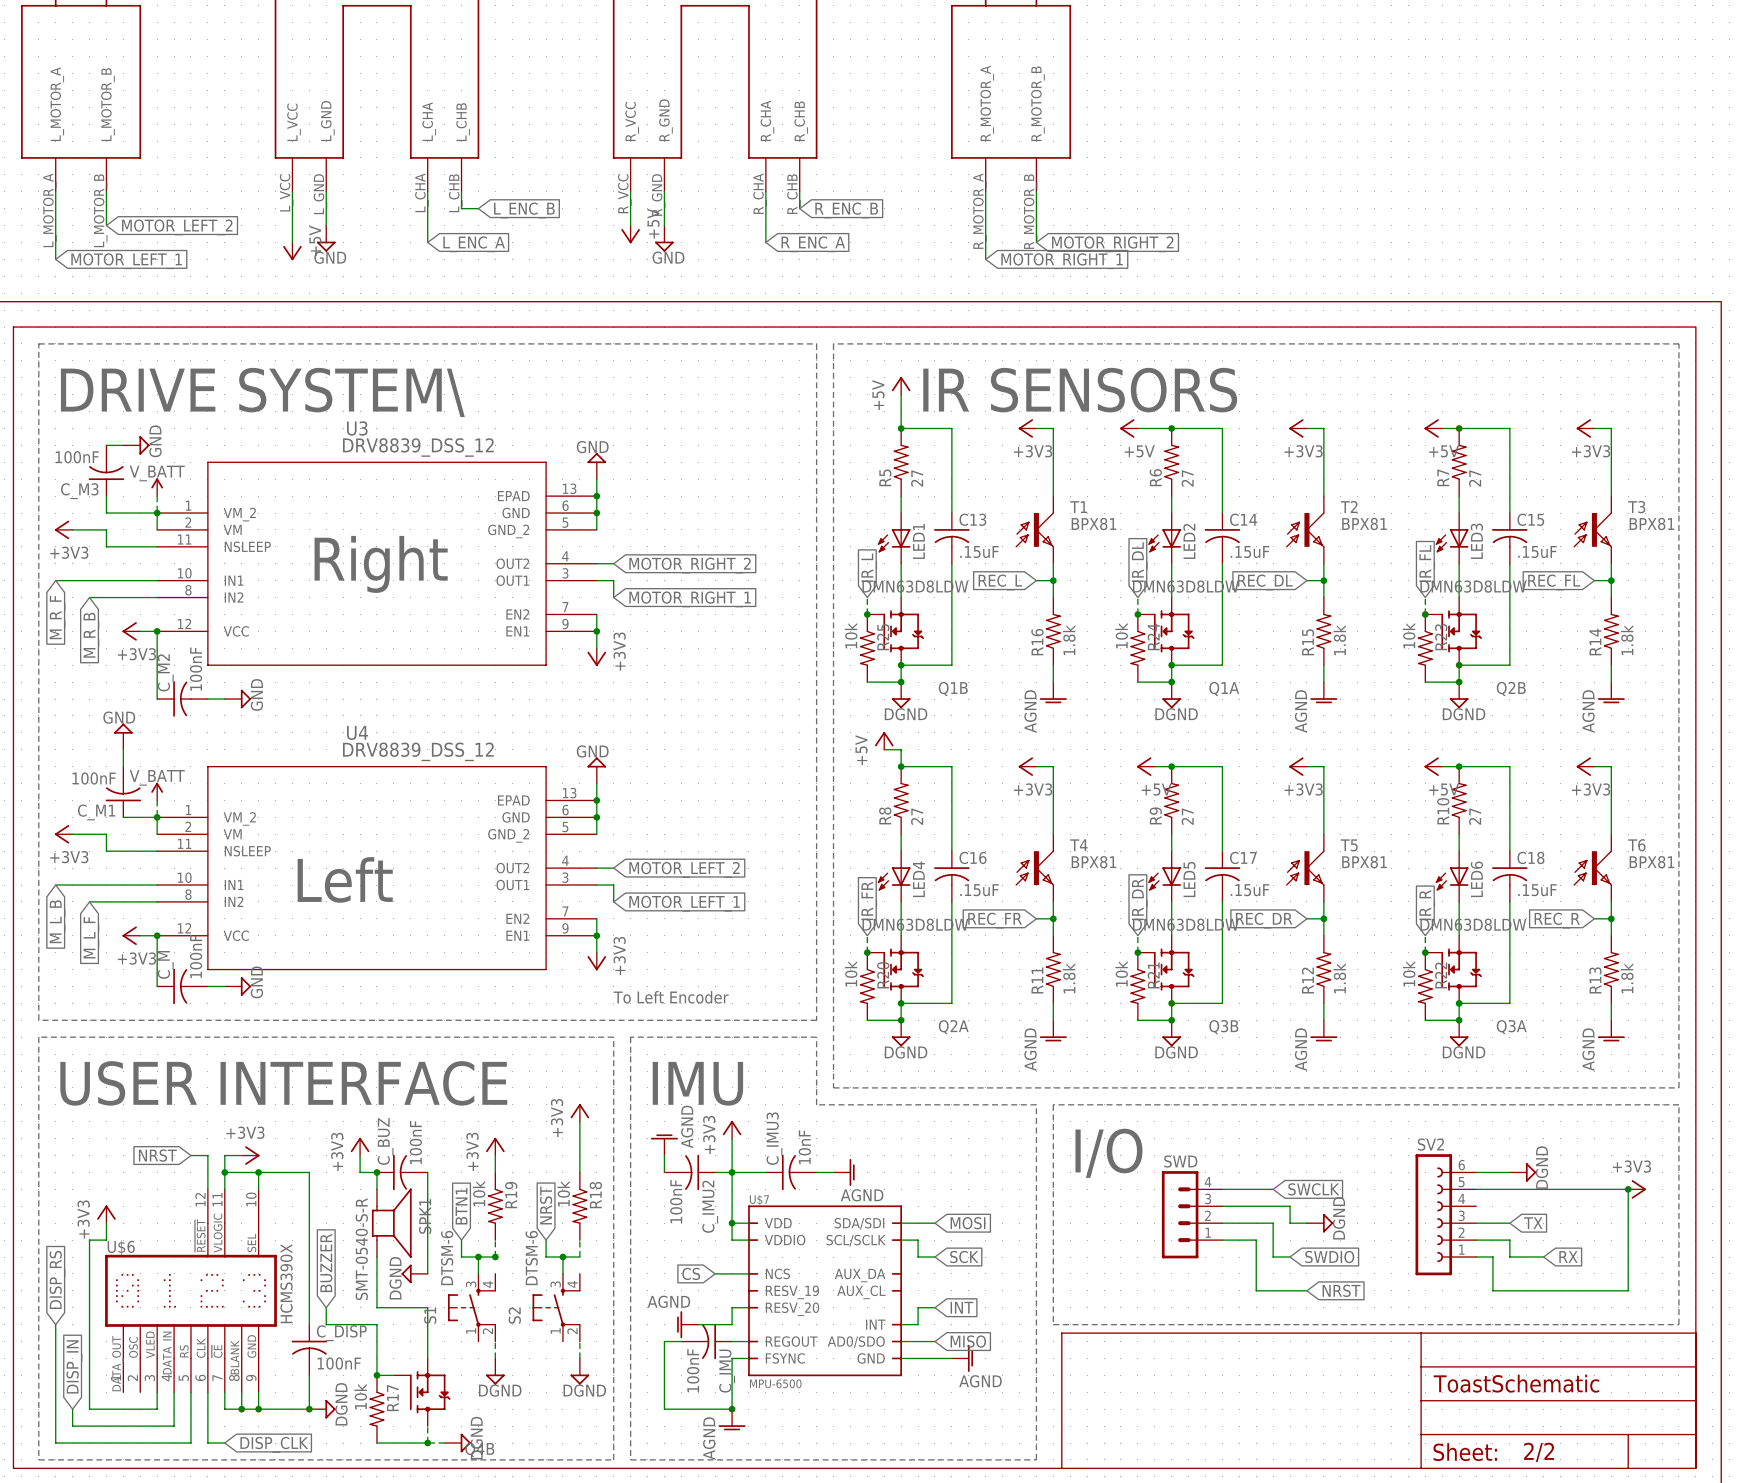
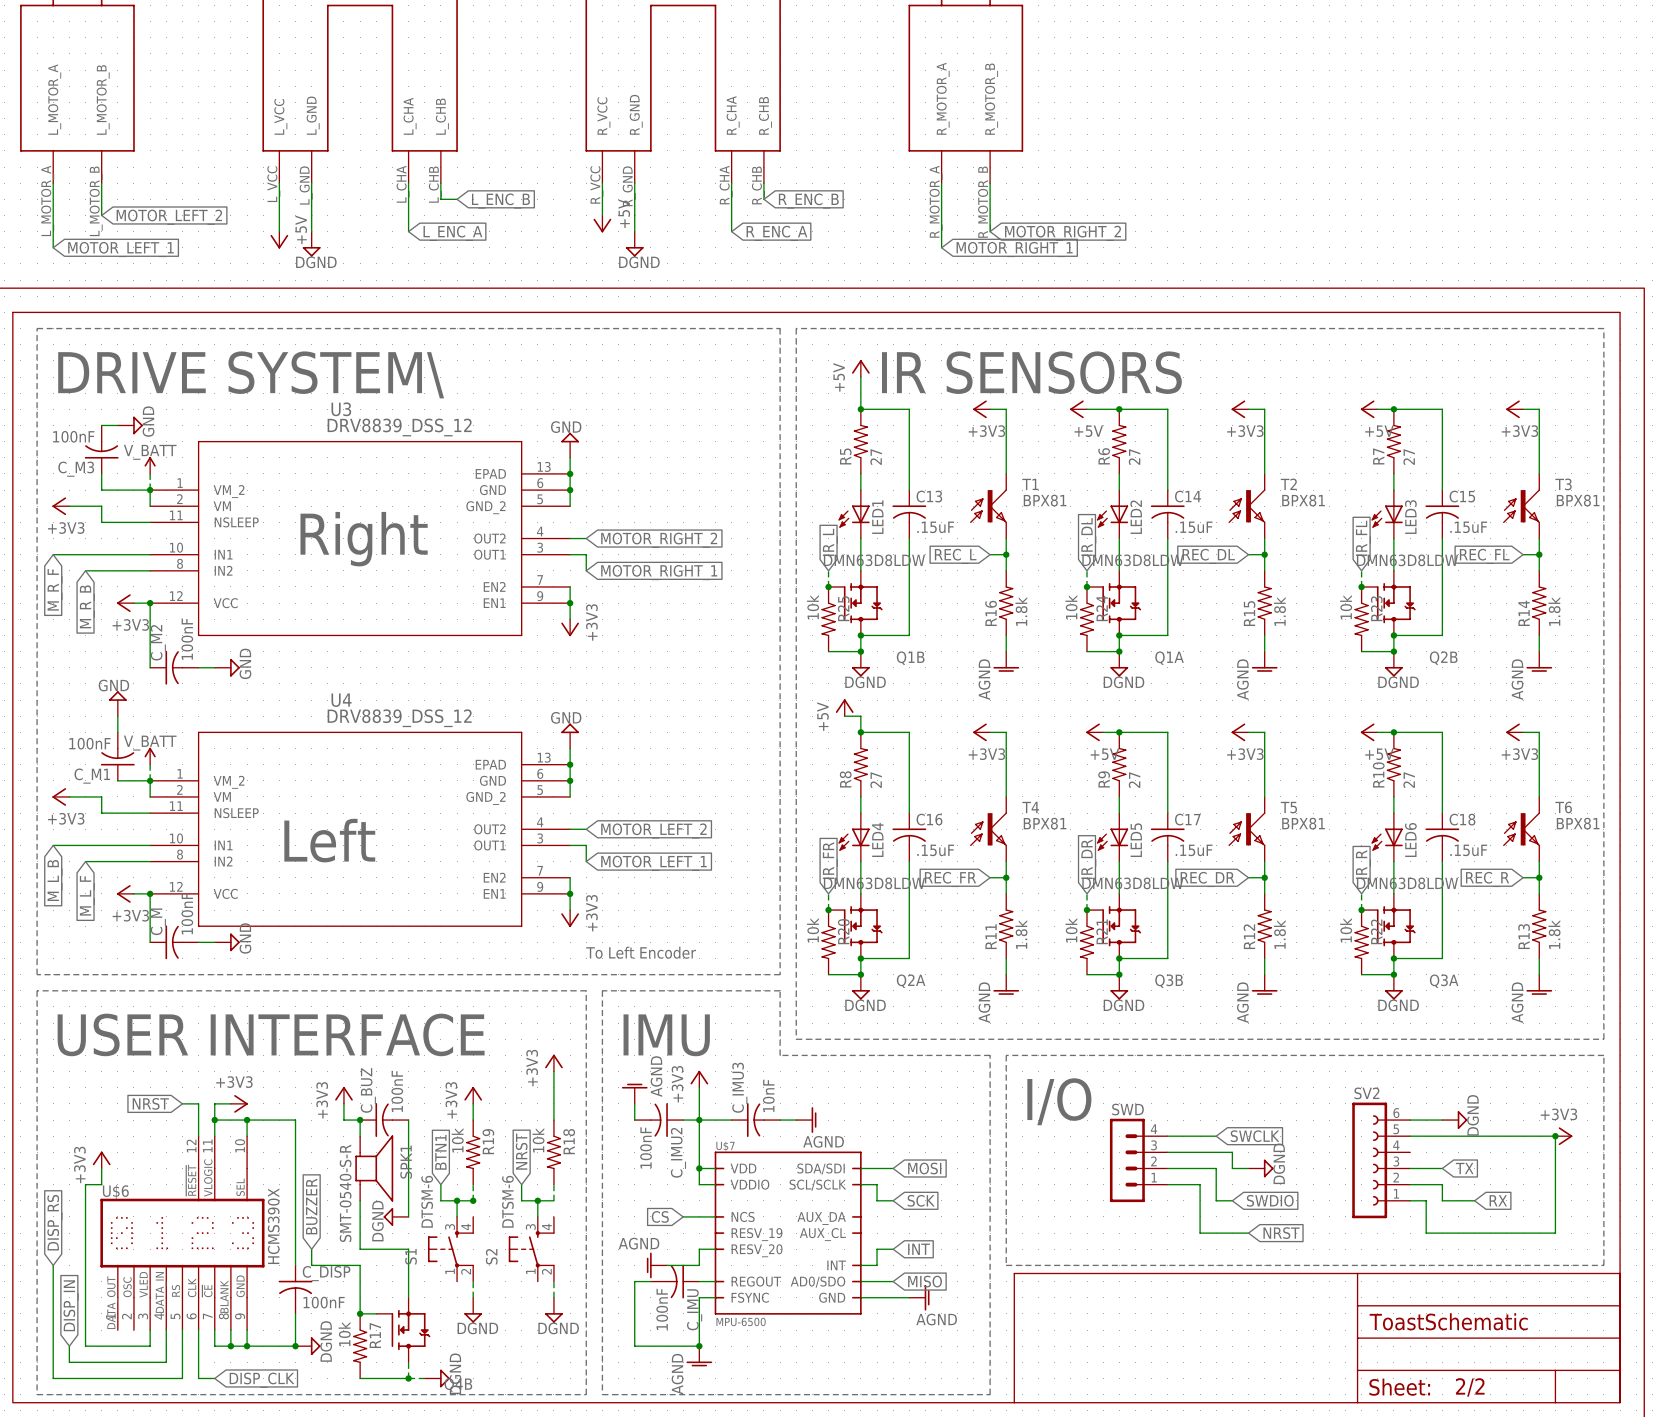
power symbol: GND (326, 238) -> none
power symbol: GND (664, 238) -> none
power symbol: none -> DGND (311, 244)
power symbol: none -> DGND (634, 244)

